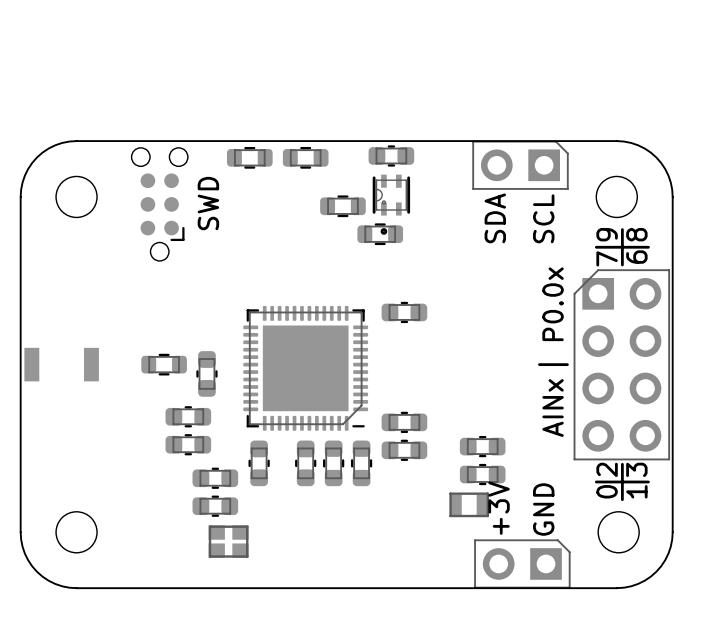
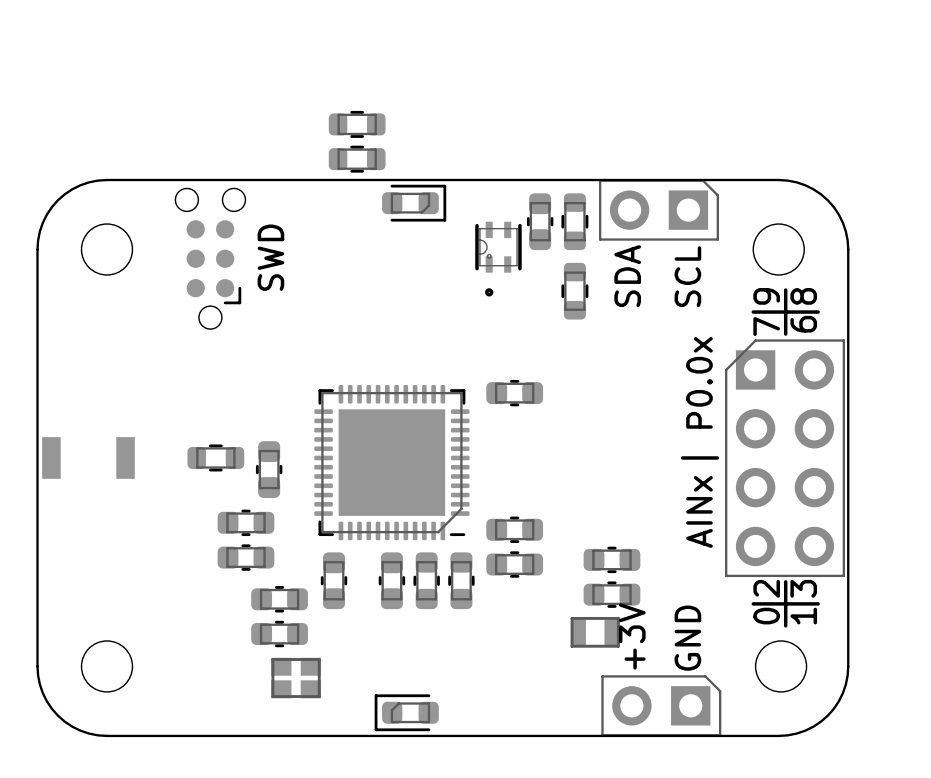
part: none -> (357, 124)
part: none -> (357, 159)
part footprint: [282, 146, 329, 169] -> [382, 184, 447, 222]
part rotation: 0° (391, 155) -> 90° clockwise (540, 221)
part position: (391, 155) -> (540, 221)
part: (249, 157) -> none
part: none -> (574, 221)
part: (342, 206) -> none
part: none -> (574, 291)
part: (380, 234) -> none
part: none -> (406, 712)

